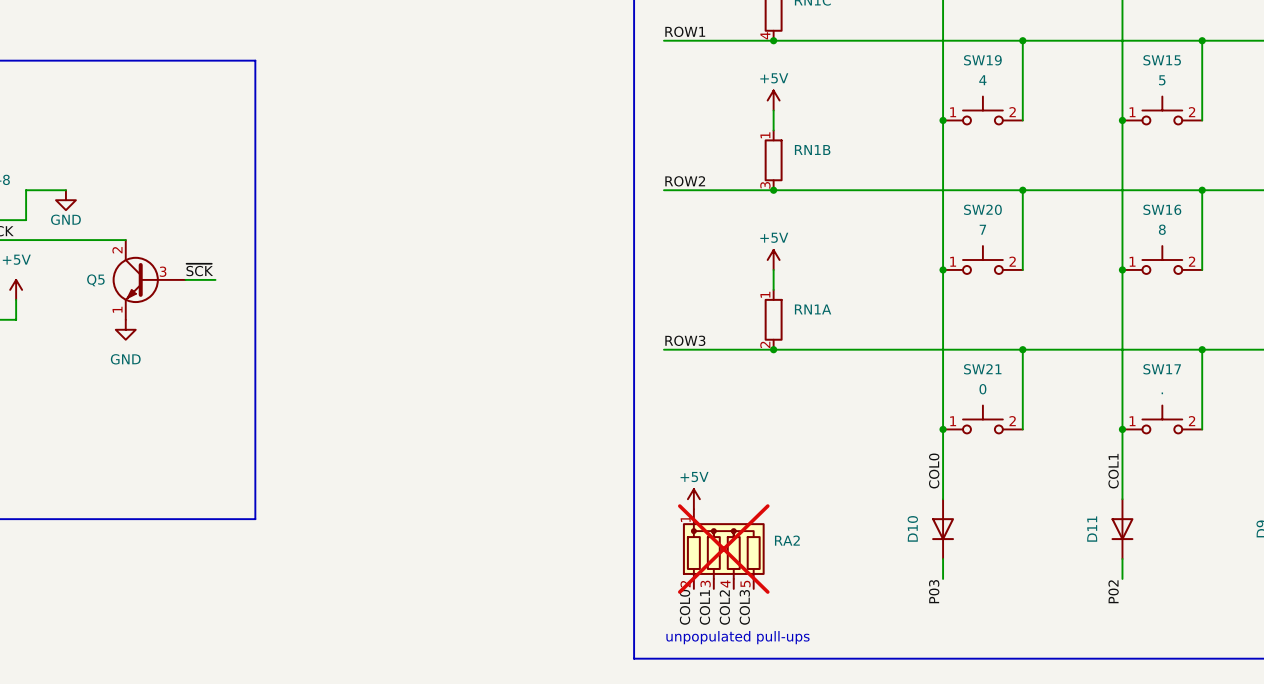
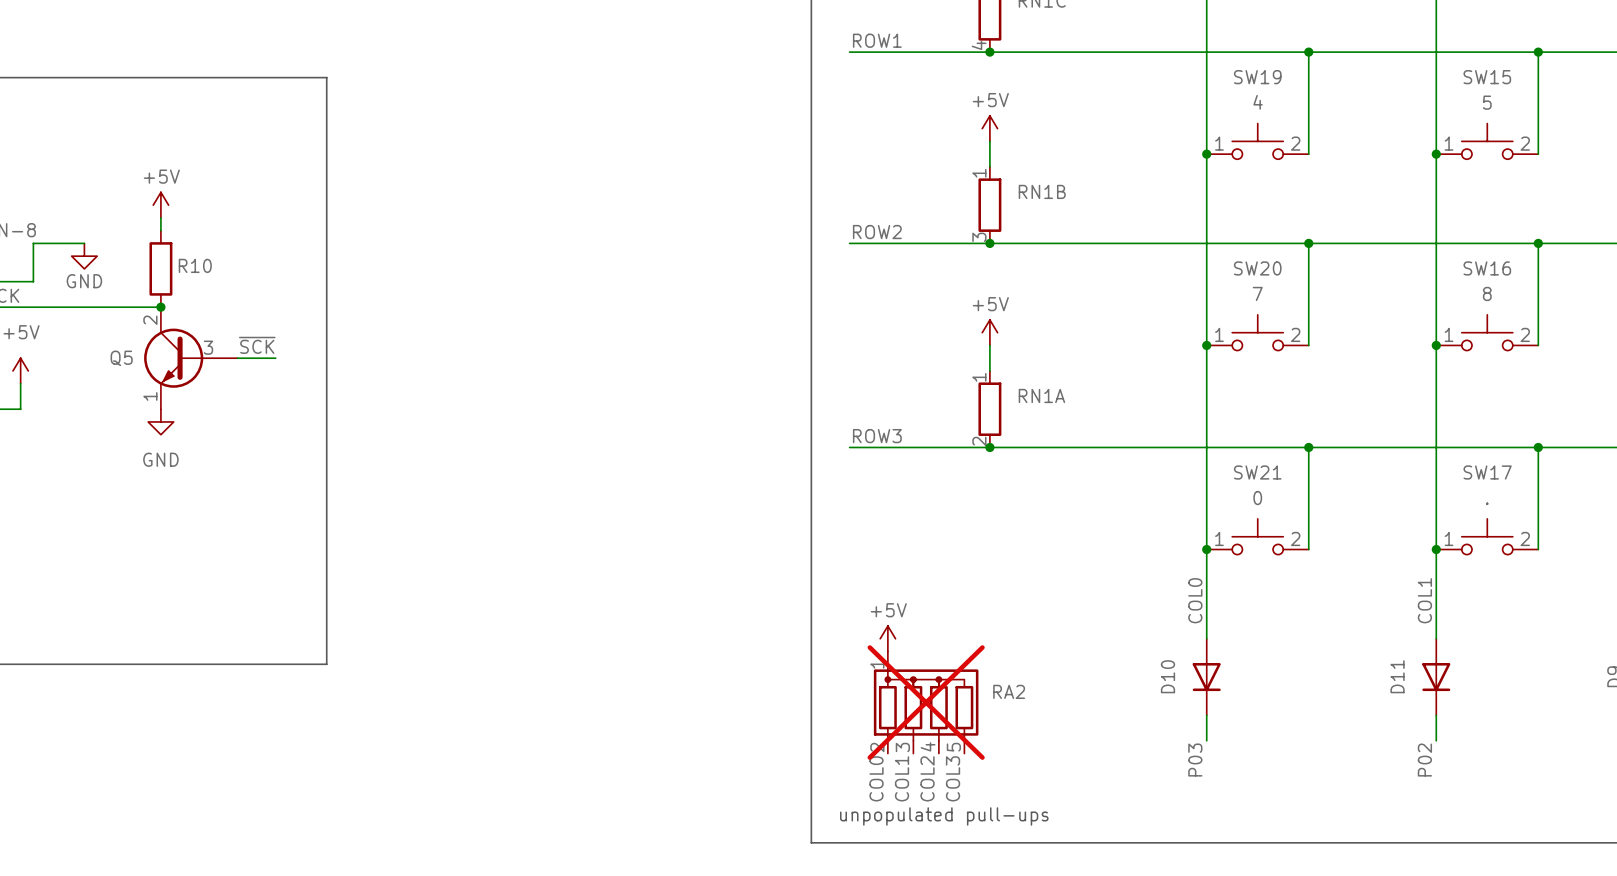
power symbol: none -> +5V (160, 205)
wire: none -> (160, 217) (160, 230)
R10: none -> (160, 268)
junction: none -> (160, 307)

